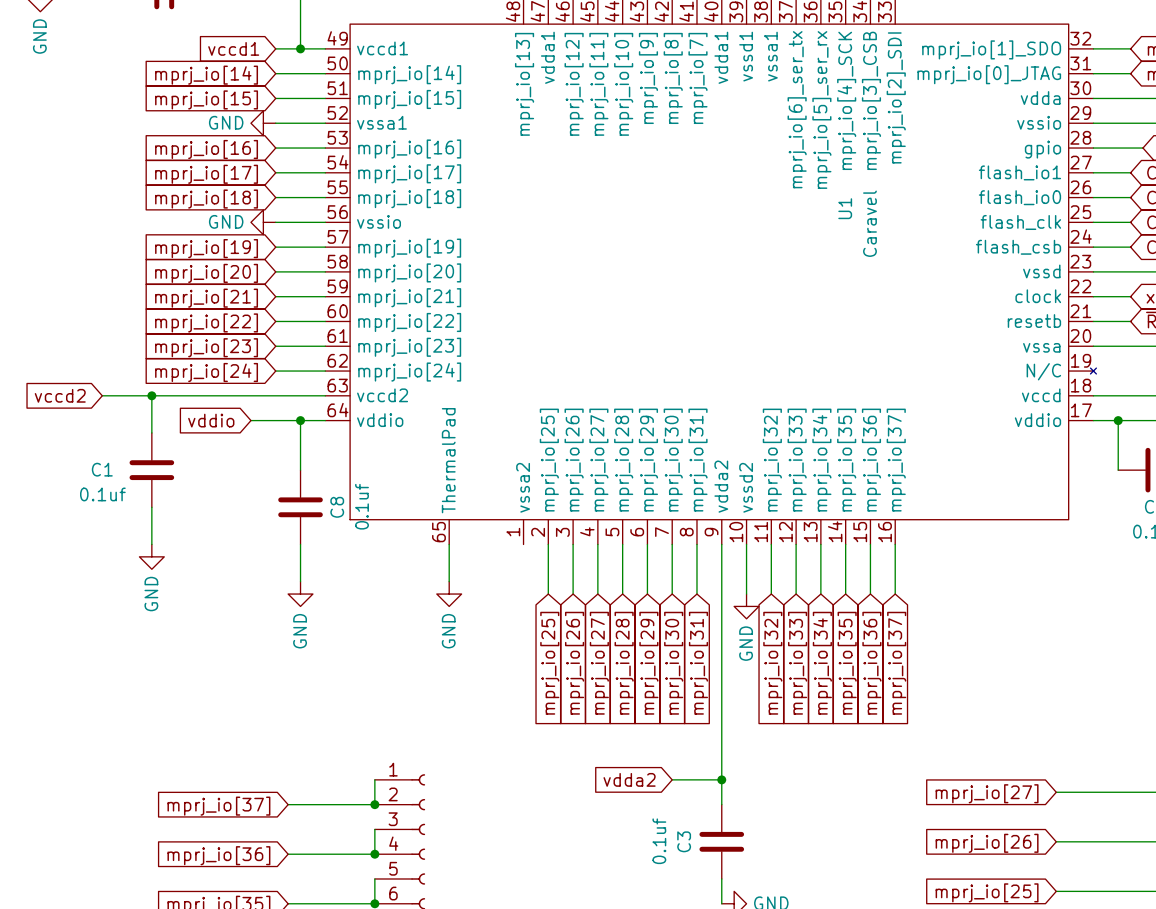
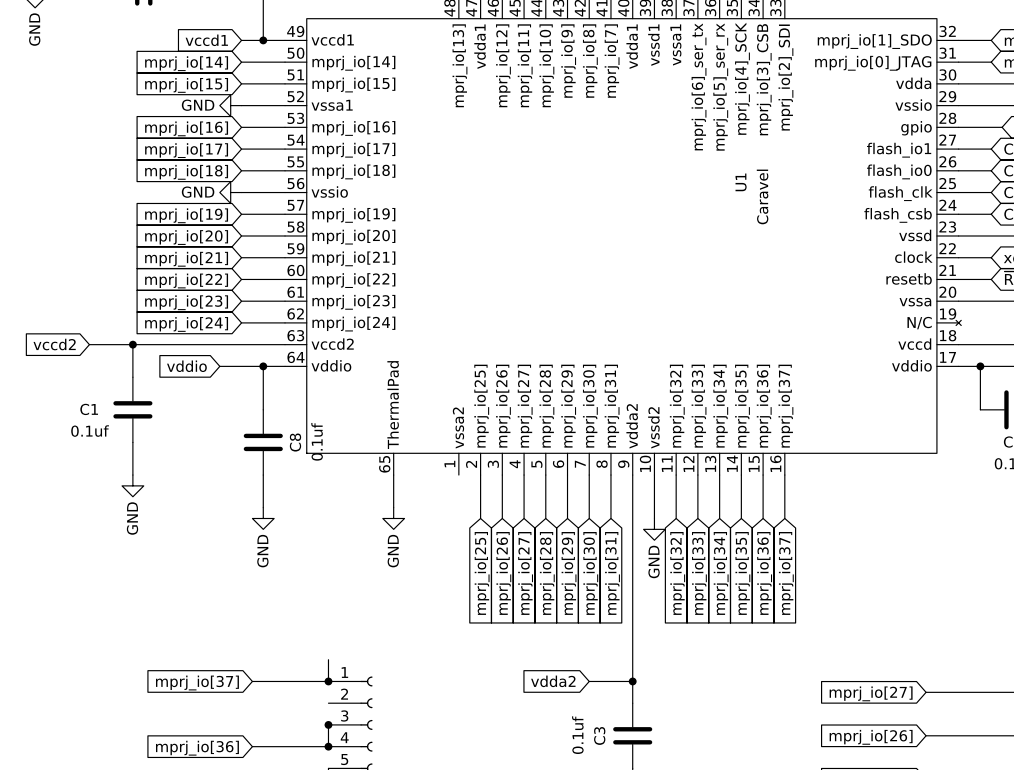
wire: (374, 779) (374, 804) (288, 804) -> (328, 659) (328, 681) (252, 681)
junction: none -> (328, 681)
junction: (374, 804) -> none
global label position: mprj_io[37] (218, 806) -> mprj_io[37] (197, 683)
junction: none -> (328, 724)

